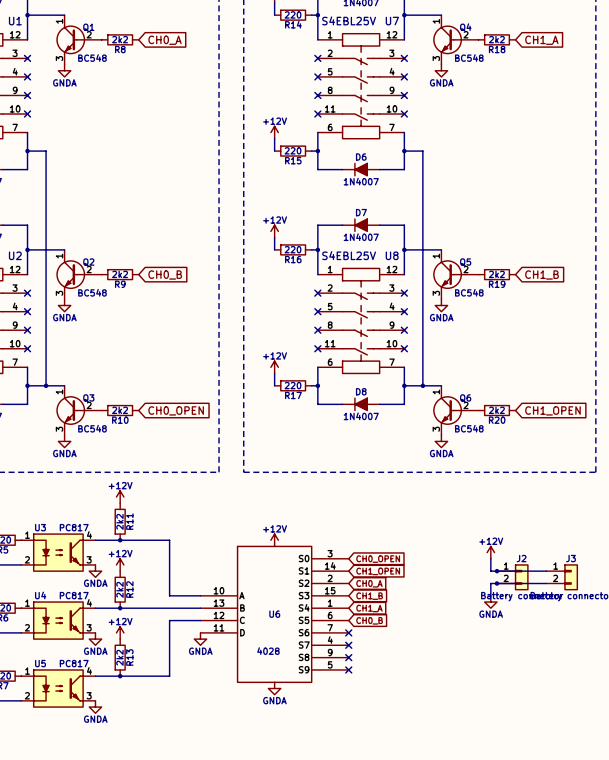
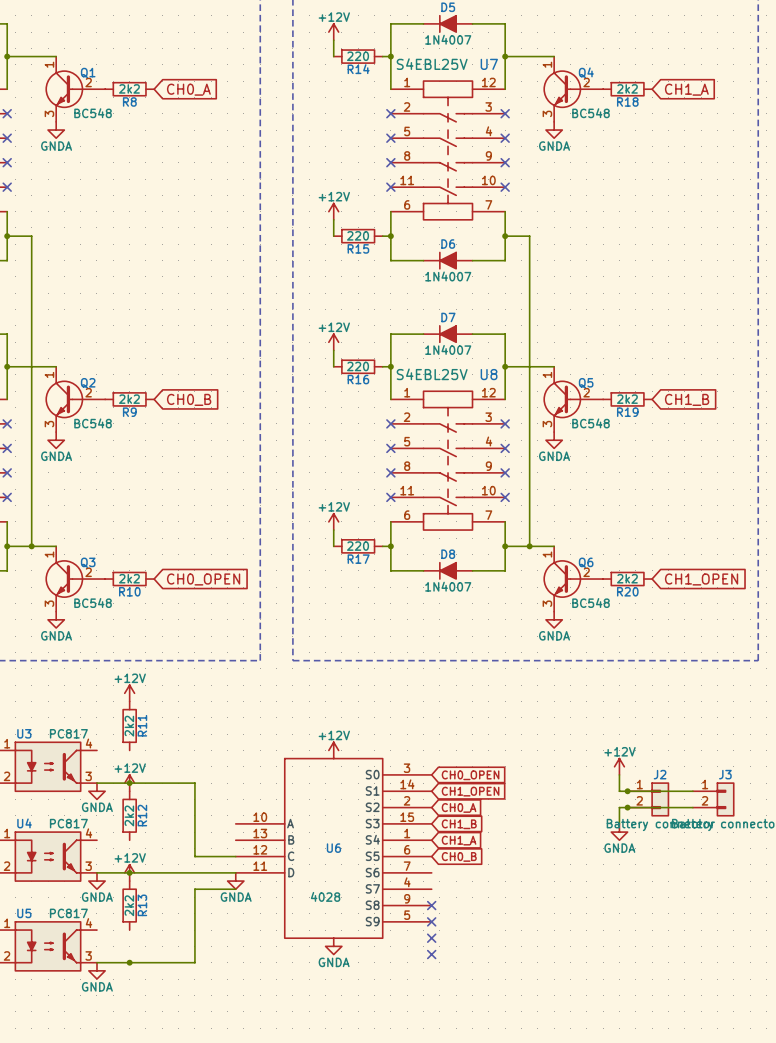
wire: (95, 540) (169, 540) (169, 564) -> (96, 783) (194, 783)
junction: (120, 540) -> none
junction: none -> (129, 783)
wire: (169, 595) (200, 595) -> (194, 823) (194, 856)
wire: (95, 608) (200, 608) -> (96, 872) (235, 872)
junction: (120, 608) -> none
wire: (169, 620) (169, 645) -> (235, 889) (194, 889)
junction: none -> (129, 872)
no-connect mark: (348, 632) -> none
no-connect mark: (348, 645) -> none
wire: (95, 676) (169, 676) -> (96, 962) (194, 962) (194, 930)
junction: (120, 676) -> none
no-connect mark: none -> (431, 938)
no-connect mark: none -> (431, 954)
junction: none -> (129, 962)

